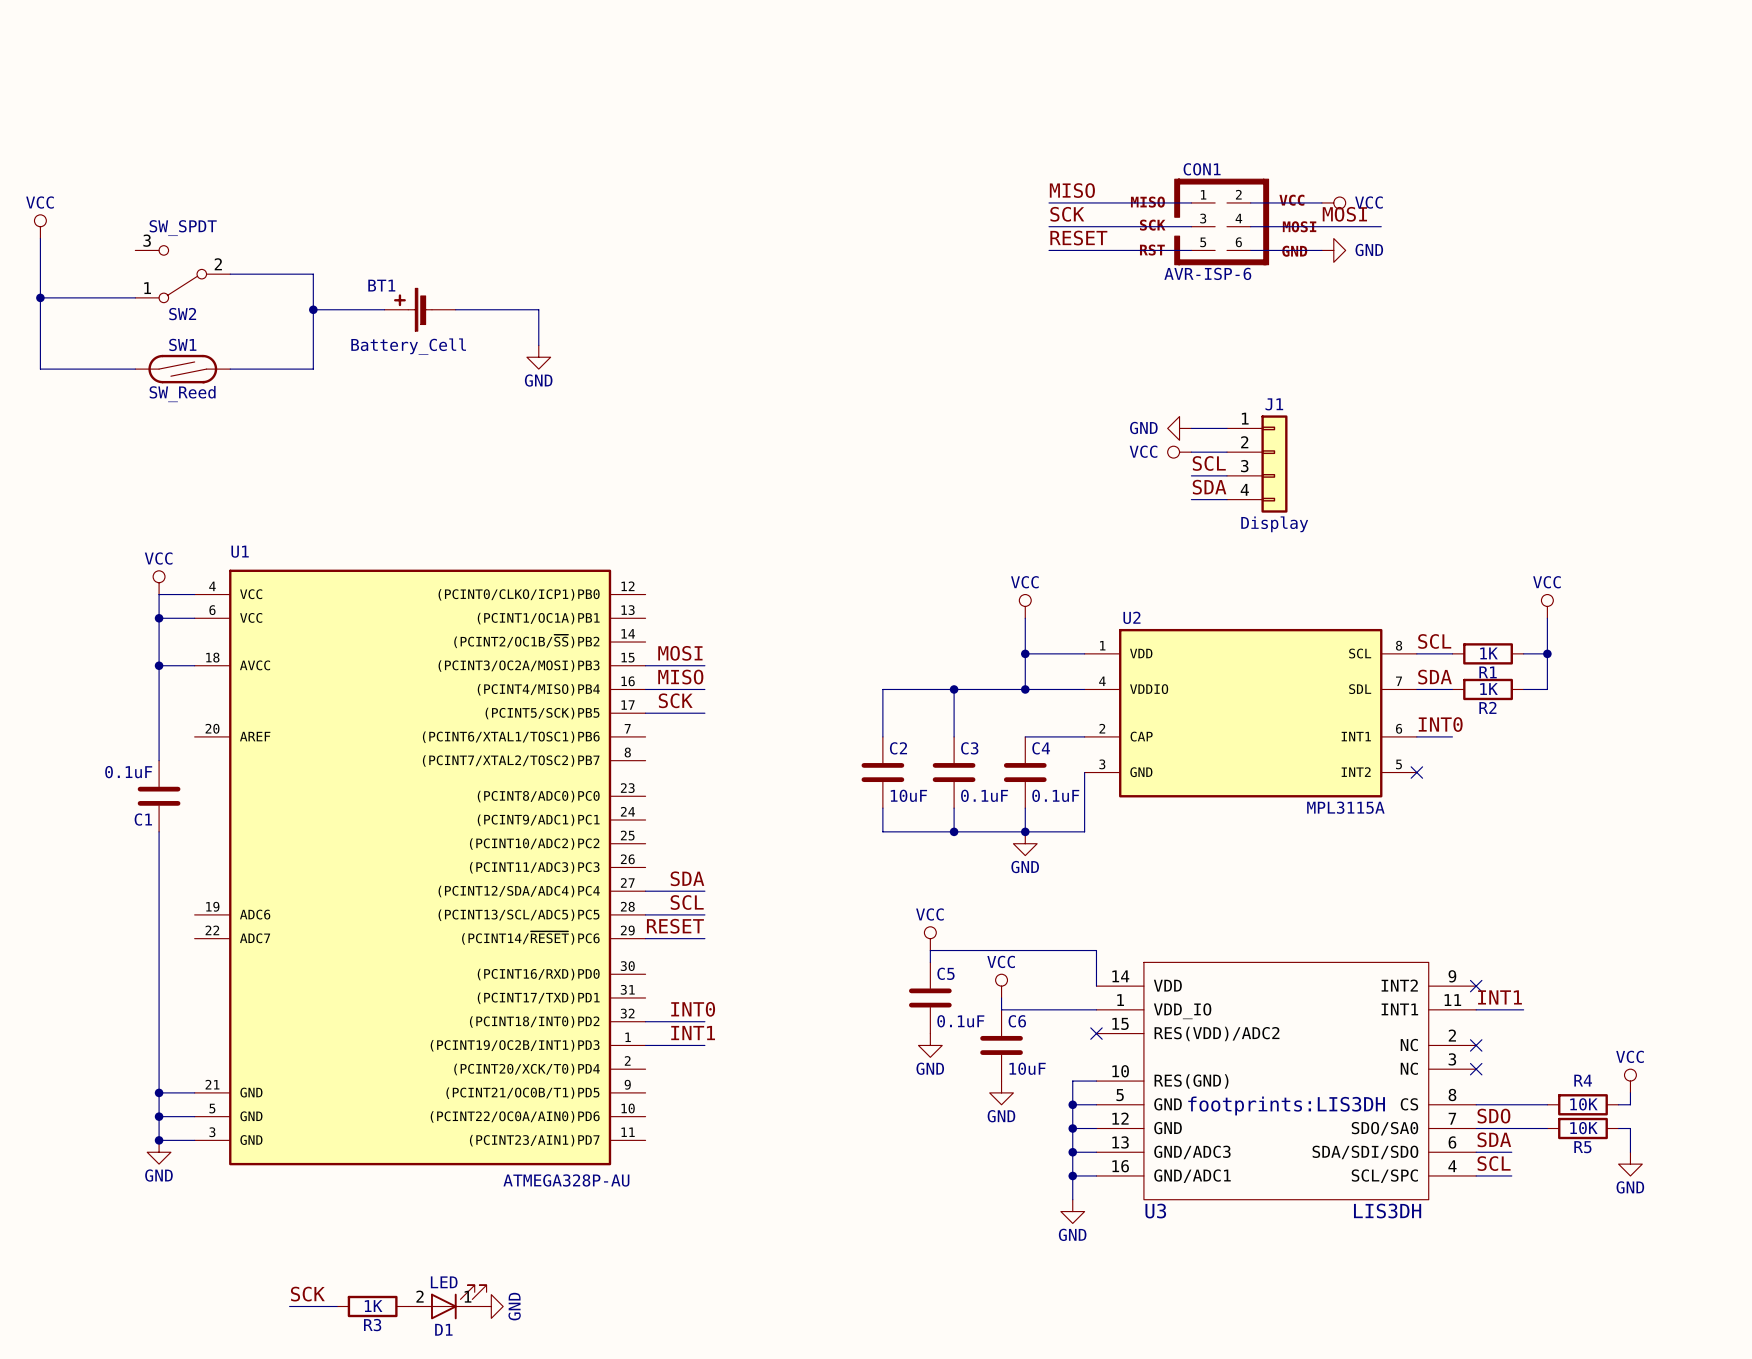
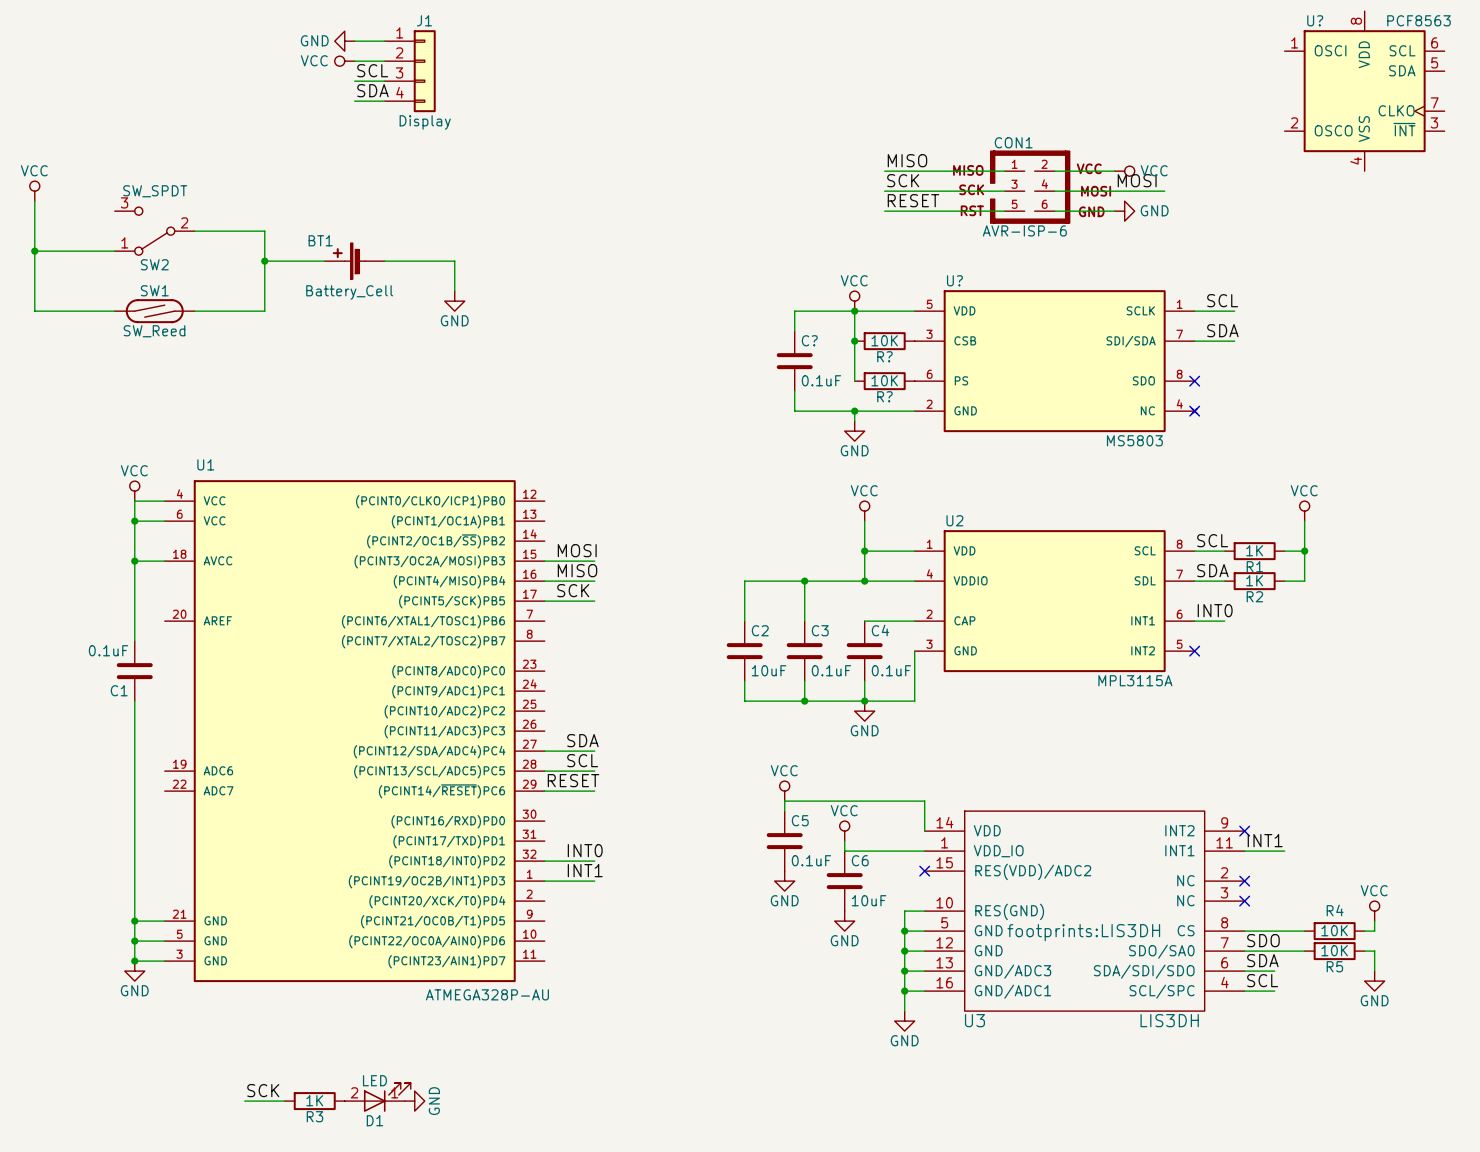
power symbol: none -> GND (344, 41)
wire: none -> (354, 41) (384, 41)
power symbol: none -> VCC (344, 61)
wire: none -> (354, 61) (384, 61)
label: none -> SCL (372, 70)
wire: none -> (354, 81) (384, 81)
label: none -> SDA (372, 90)
U?: none -> PCF8563 (1364, 91)
wire: none -> (354, 101) (384, 101)
label: none -> SCL (1222, 300)
wire: none -> (854, 311) (854, 381)
junction: none -> (854, 311)
wire: none -> (914, 311) (794, 311) (794, 331)
wire: none -> (1194, 311) (1234, 311)
label: none -> SDA (1222, 330)
junction: none -> (854, 341)
R?: none -> 10K (884, 341)
wire: none -> (1194, 341) (1234, 341)
C?: none -> 0.1uF (794, 361)
power symbol rotation: 0° (1179, 428) -> 90° counterclockwise (854, 431)
power symbol position: GND (1179, 428) -> GND (854, 431)
U?: none -> MS5803 (1055, 361)
R?: none -> 10K (884, 381)
power symbol rotation: 0° (1179, 452) -> 90° clockwise (854, 301)
power symbol position: VCC (1179, 452) -> VCC (854, 301)
no-connect mark: none -> (1194, 381)
label: SCL (1209, 463) -> none
wire: none -> (794, 391) (794, 411) (914, 411)
J1 position: (1257, 464) -> (410, 71)
wire: none -> (854, 411) (854, 421)
junction: none -> (854, 411)
label: SDA (1209, 487) -> none
no-connect mark: none -> (1194, 411)

